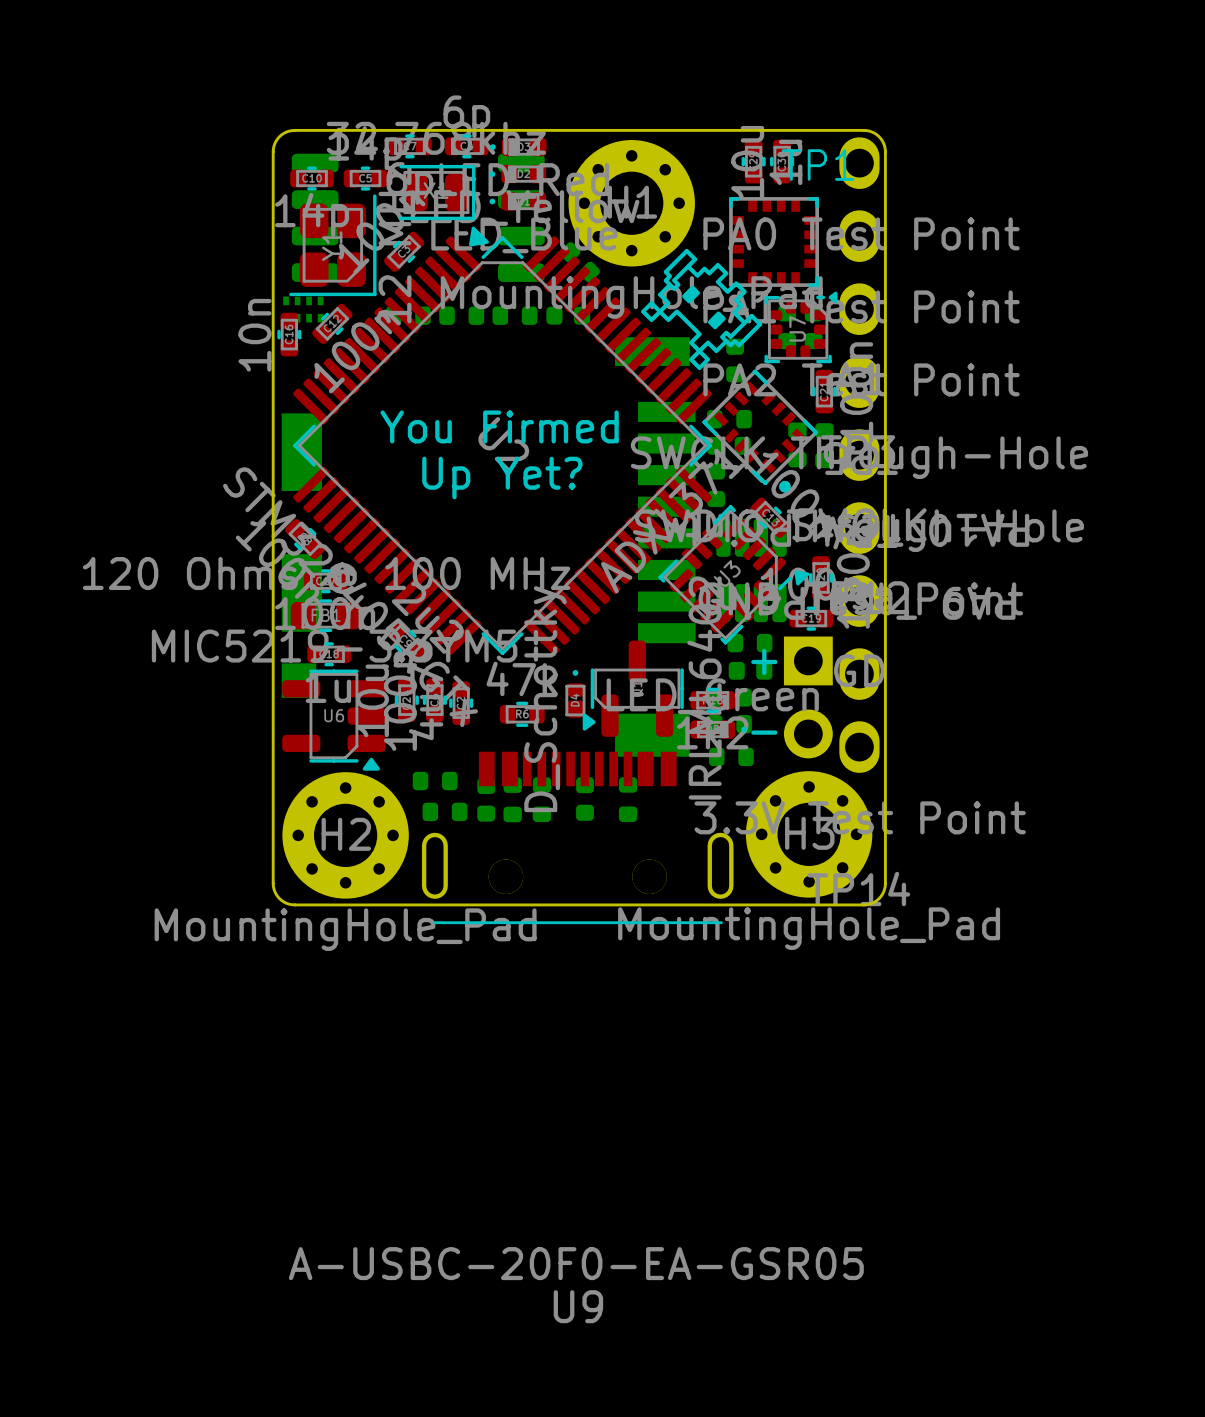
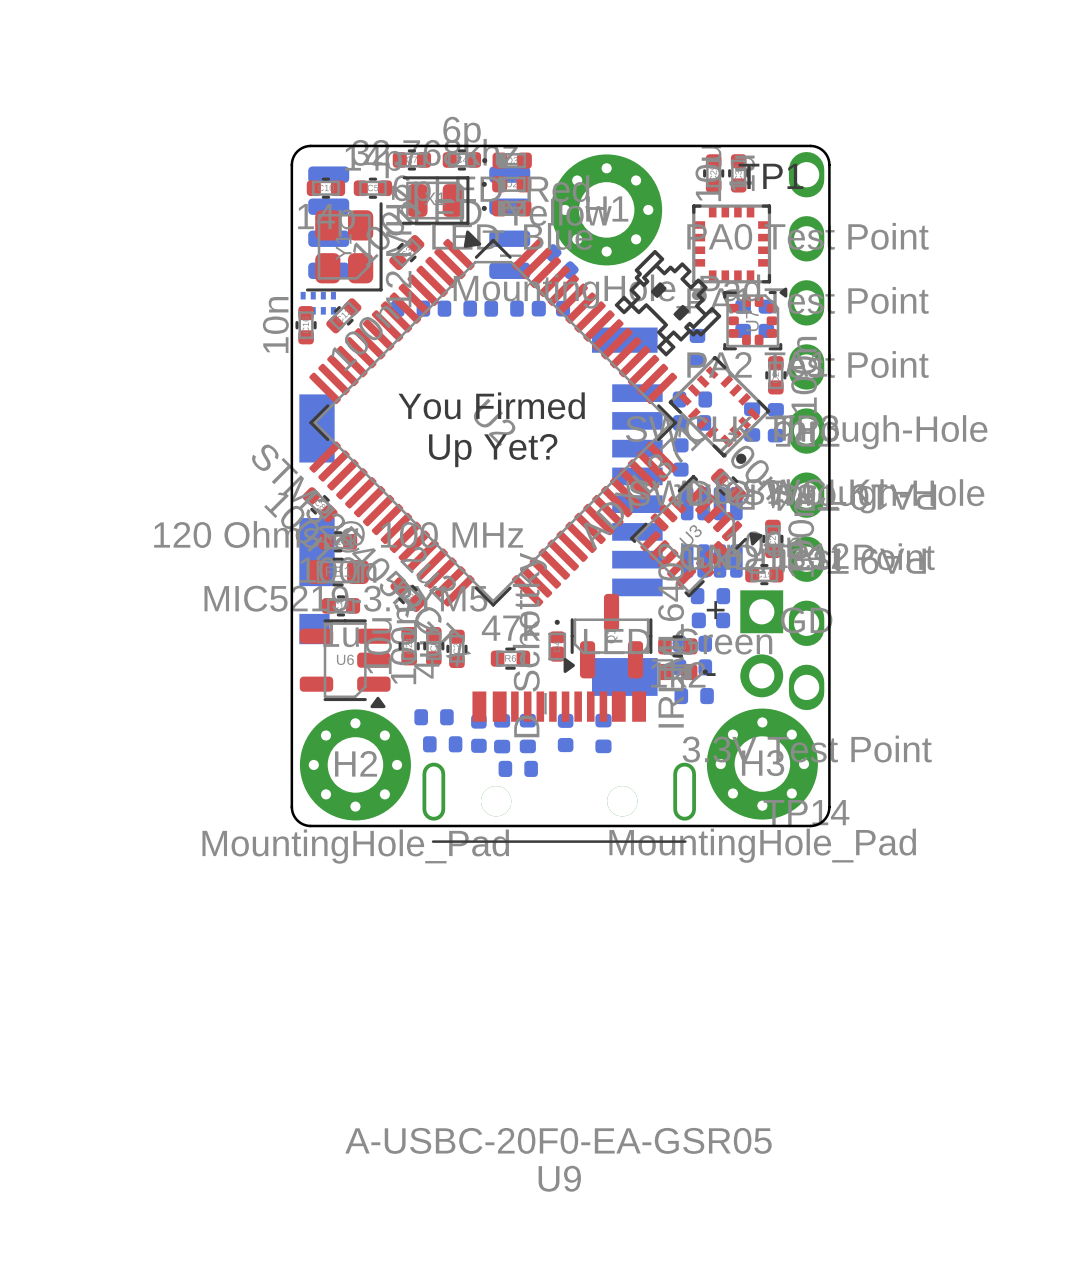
part: none -> (518, 768)

